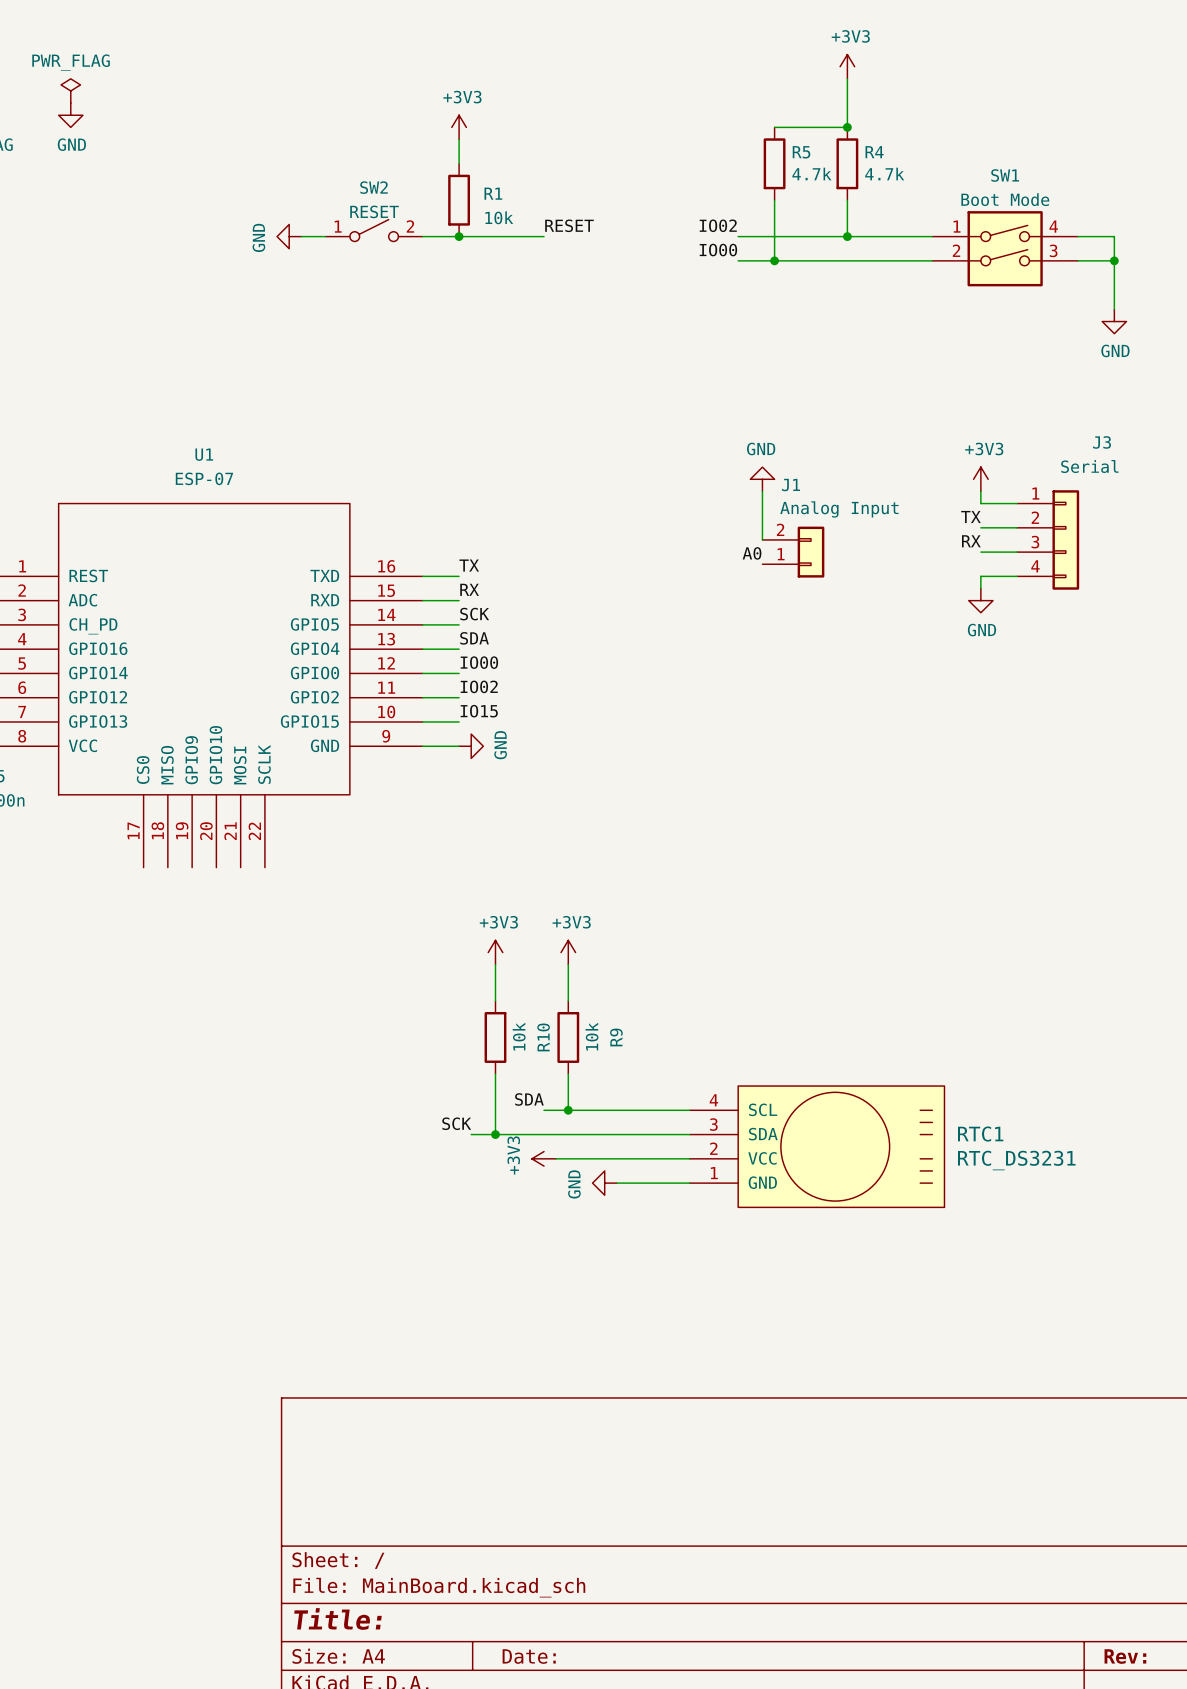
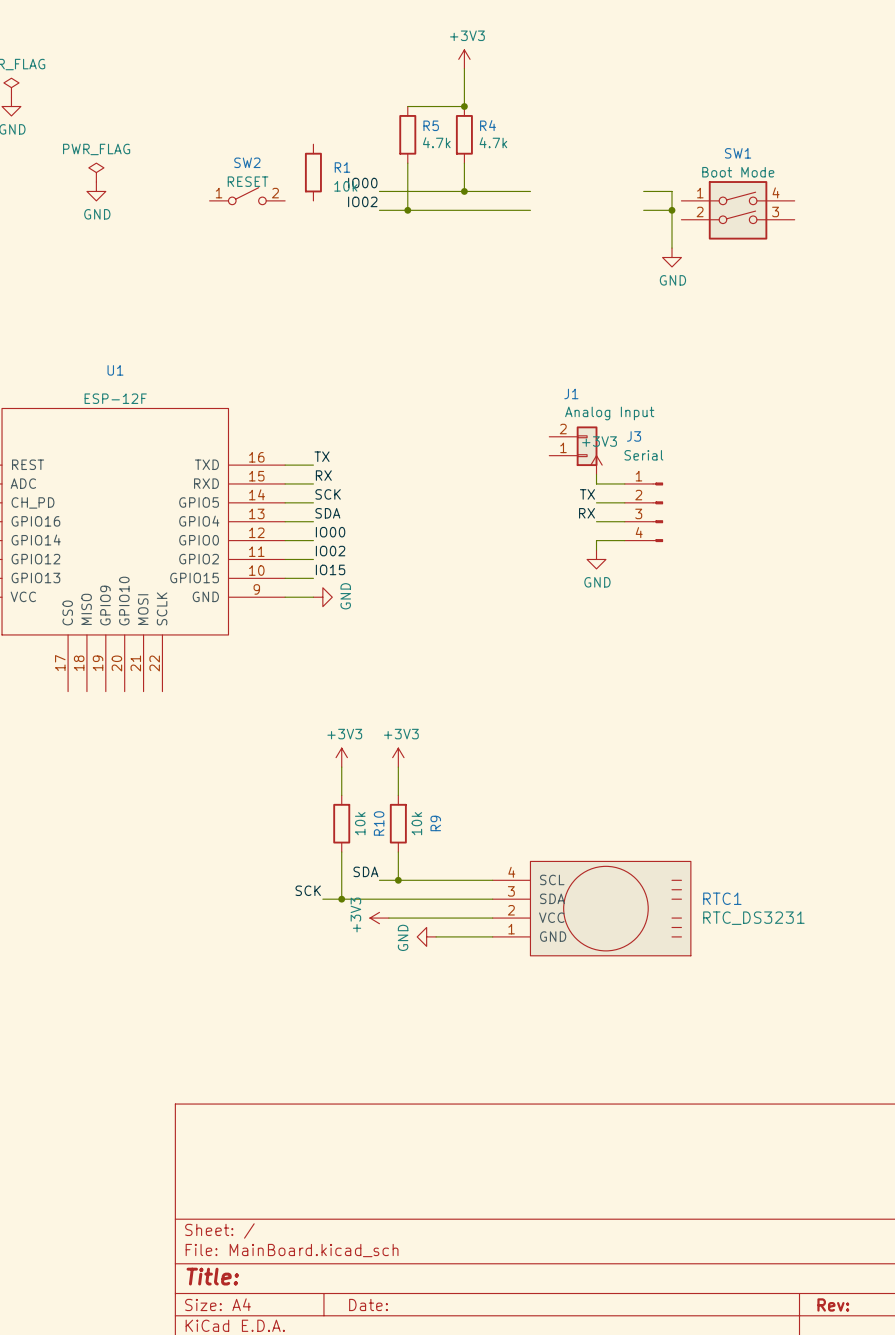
power symbol: none -> +3V3 (464, 59)
power symbol: +3V3 (847, 66) -> none
wire: (847, 78) (847, 127) (774, 127) -> (464, 68) (464, 106) (407, 106)
junction: none -> (464, 106)
power symbol: +3V3 (459, 127) -> none
junction: (847, 127) -> none
wire: (459, 139) (459, 163) -> none
R5 position: (774, 163) -> (407, 134)
R4 position: (847, 163) -> (464, 134)
power symbol: none -> PWR_FLAG (96, 172)
wire: (774, 200) (774, 260) -> (407, 163) (407, 210)
wire: (847, 200) (847, 236) -> (464, 163) (464, 191)
junction: none -> (464, 191)
label: RESET (569, 225) -> none
label position: IO02 (718, 225) -> IO02 (362, 201)
power symbol rotation: 0° (289, 236) -> 90° counterclockwise (96, 191)
power symbol position: GND (289, 236) -> GND (96, 191)
wire: (301, 236) (325, 236) -> none
wire: (422, 236) (544, 236) -> none
junction: (459, 236) -> none
wire: (738, 236) (932, 236) -> (379, 191) (530, 191)
junction: (847, 236) -> none
wire: (1077, 236) (1114, 236) (1114, 309) -> (643, 191) (672, 191) (672, 248)
junction: none -> (407, 210)
junction: none -> (672, 210)
label position: IO00 (718, 250) -> IO00 (362, 183)
wire: (738, 260) (932, 260) -> (379, 210) (530, 210)
junction: (774, 260) -> none
wire: (1077, 260) (1114, 260) -> (643, 210) (672, 210)
junction: (1114, 260) -> none
power symbol: none -> GND (672, 257)
power symbol: GND (1114, 321) -> none
J3 name position: J3 (1102, 442) -> J3 (634, 436)
J3 value position: Serial (1089, 466) -> Serial (643, 455)
U1 value: ESP-07 (204, 478) -> ESP-12F (115, 398)
power symbol: GND (762, 479) -> none
power symbol position: +3V3 (980, 479) -> +3V3 (596, 465)
J3 symbol: [1017, 490, 1080, 590] -> [624, 482, 664, 543]
wire: (762, 491) (762, 539) -> none
wire: (980, 491) (980, 503) (1017, 503) -> (596, 474) (596, 483) (624, 483)
label position: TX (970, 517) -> TX (587, 494)
wire: (980, 527) (1017, 527) -> (596, 502) (624, 502)
label position: RX (971, 541) -> RX (587, 513)
wire: (980, 552) (1017, 552) -> (596, 521) (624, 521)
label: A0 (752, 553) -> none
wire: (1017, 576) (980, 576) (980, 588) -> (624, 540) (596, 540) (596, 550)
power symbol: GND (980, 600) -> none
power symbol: none -> GND (596, 559)

